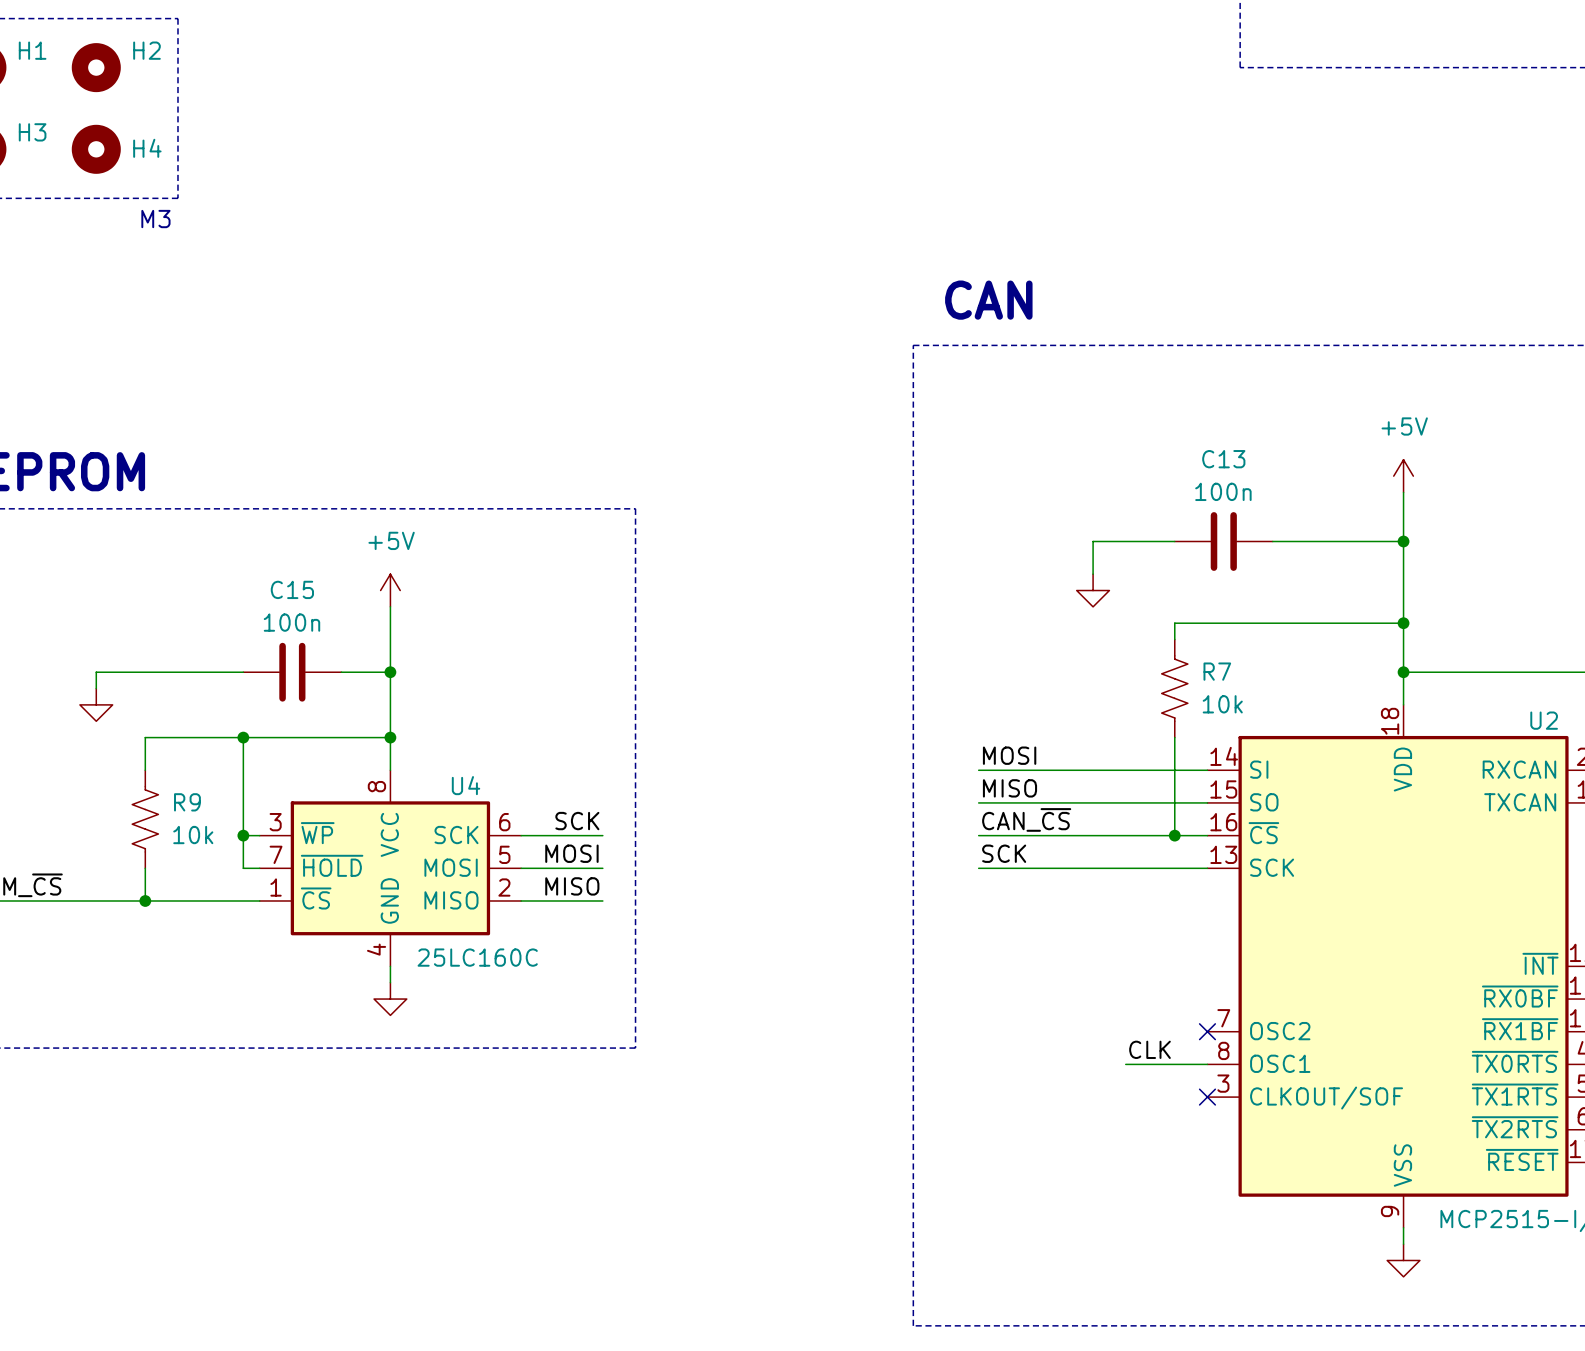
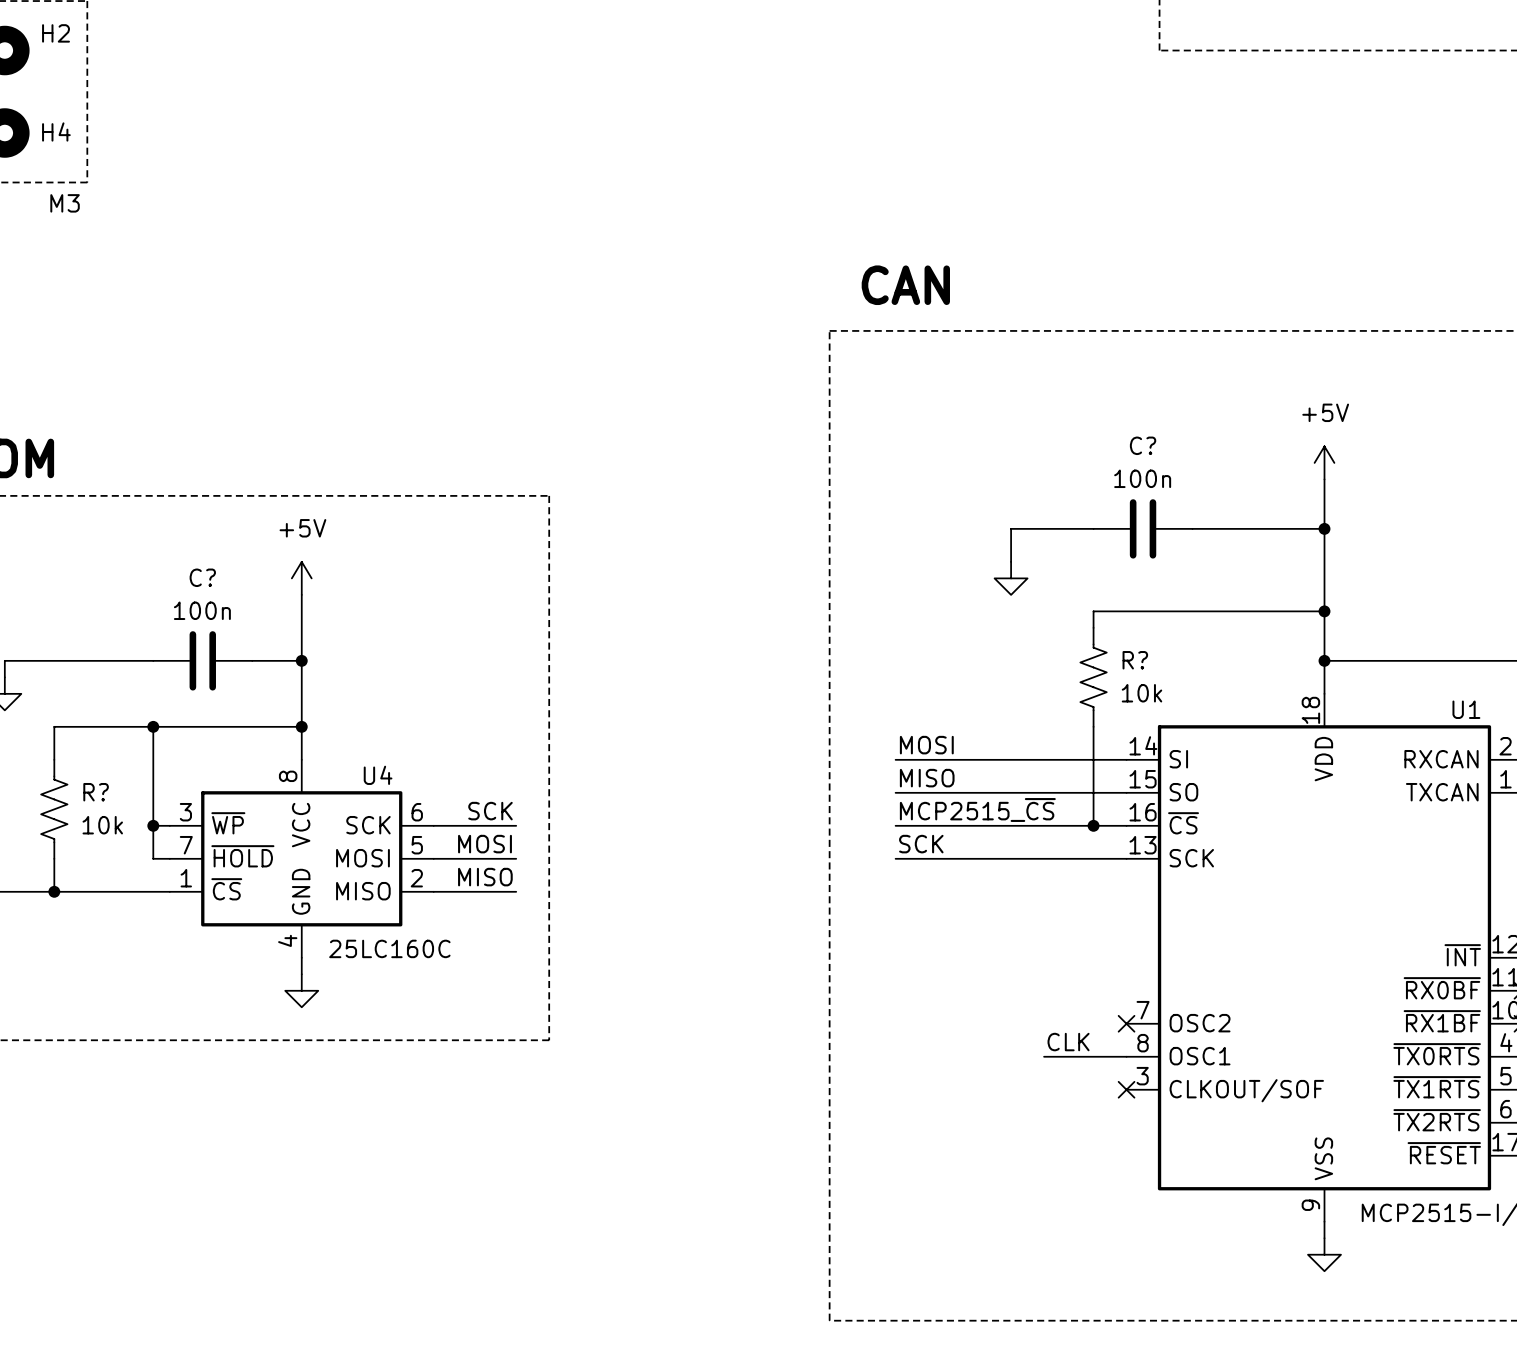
C13 name: C13 (1223, 459) -> C? (1143, 445)
C15 name: C15 (292, 589) -> C? (202, 577)
R7 name: R7 (1217, 671) -> R? (1135, 660)
U2 name: U2 (1544, 720) -> U1 (1466, 709)
R9 name: R9 (187, 802) -> R? (96, 792)
label: CAN_~{CS} (1026, 819) -> MCP2515_~{CS} (977, 809)

